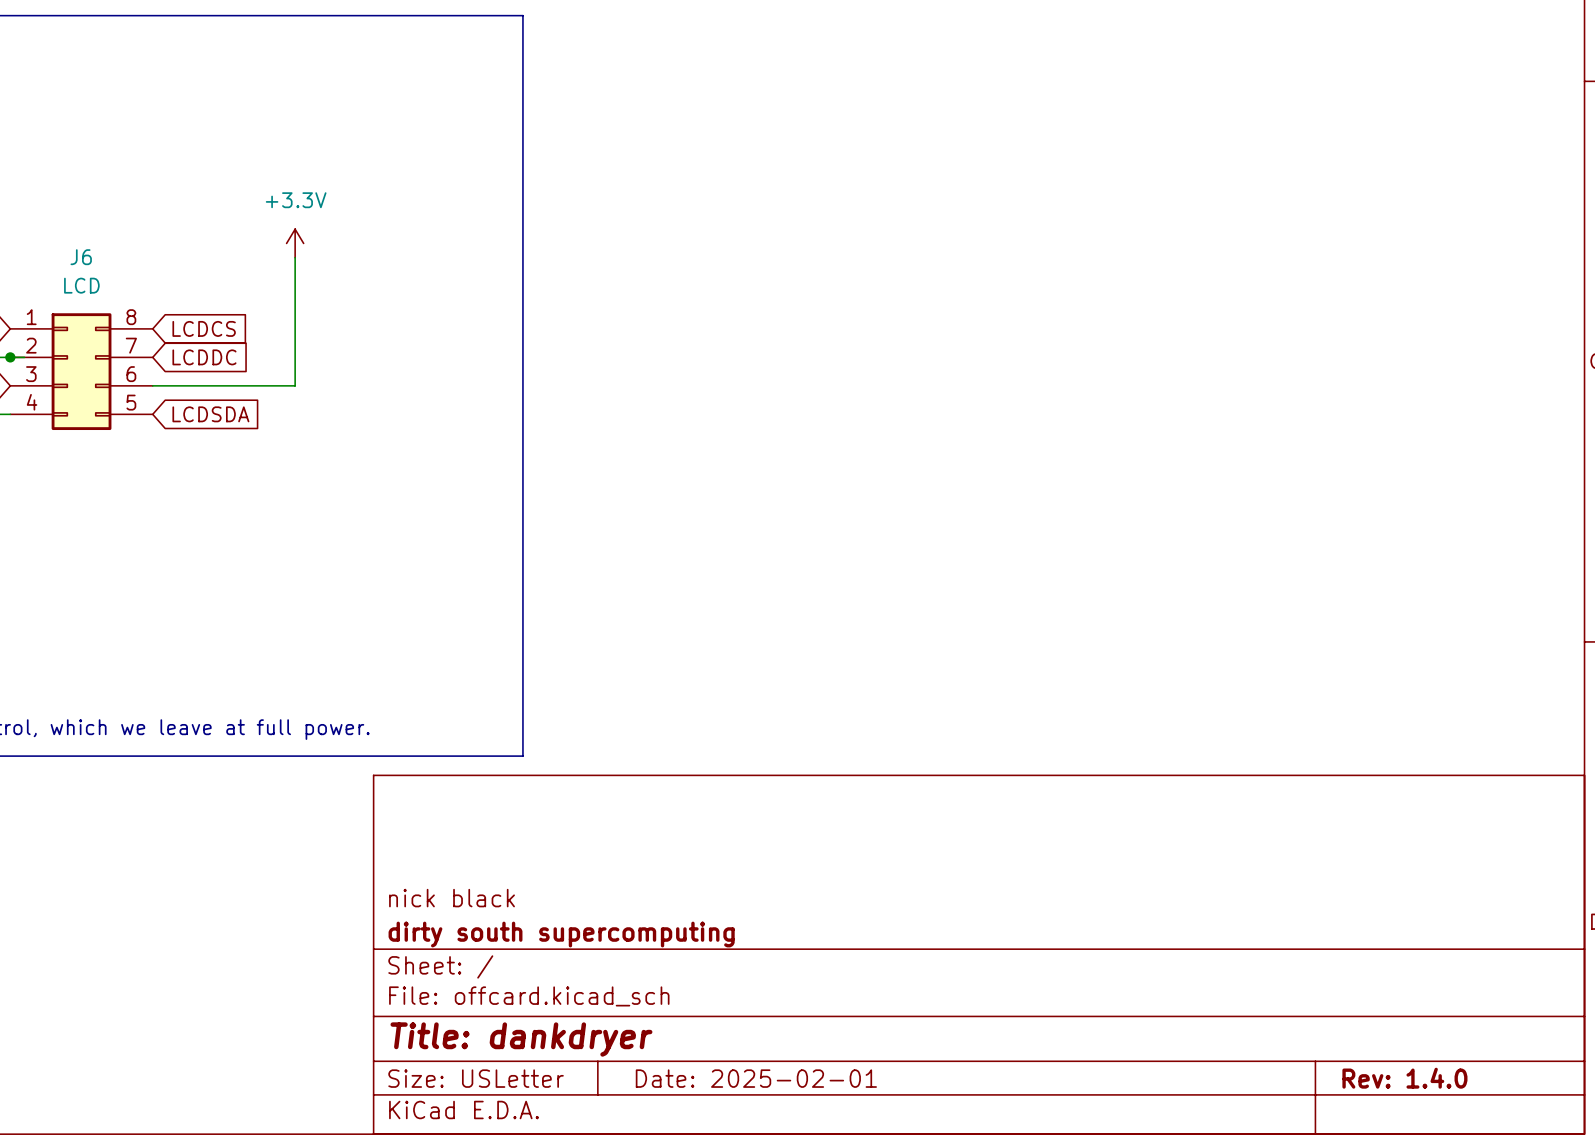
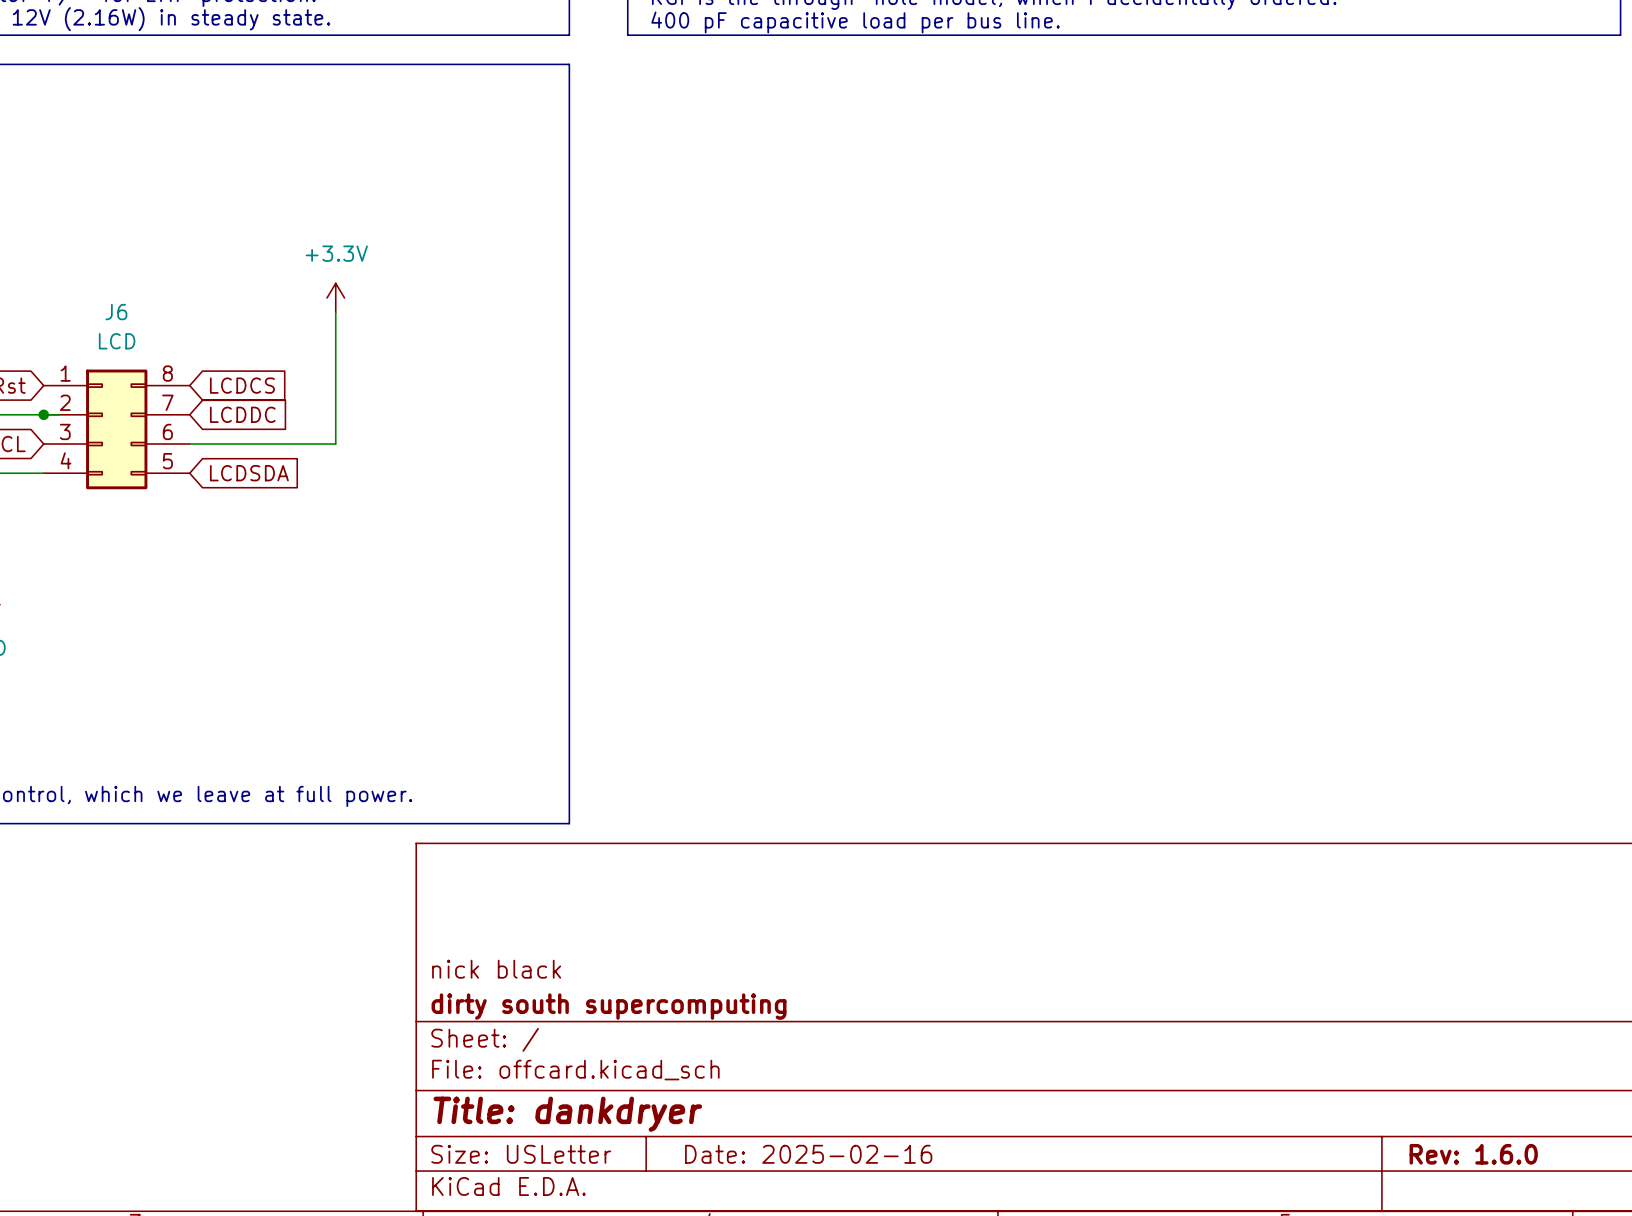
title block: Date: 2025-02-01 (756, 1078) -> Date: 2025-02-16 (808, 1154)
title block: Rev: 1.4.0 (1404, 1078) -> Rev: 1.6.0 (1473, 1154)

